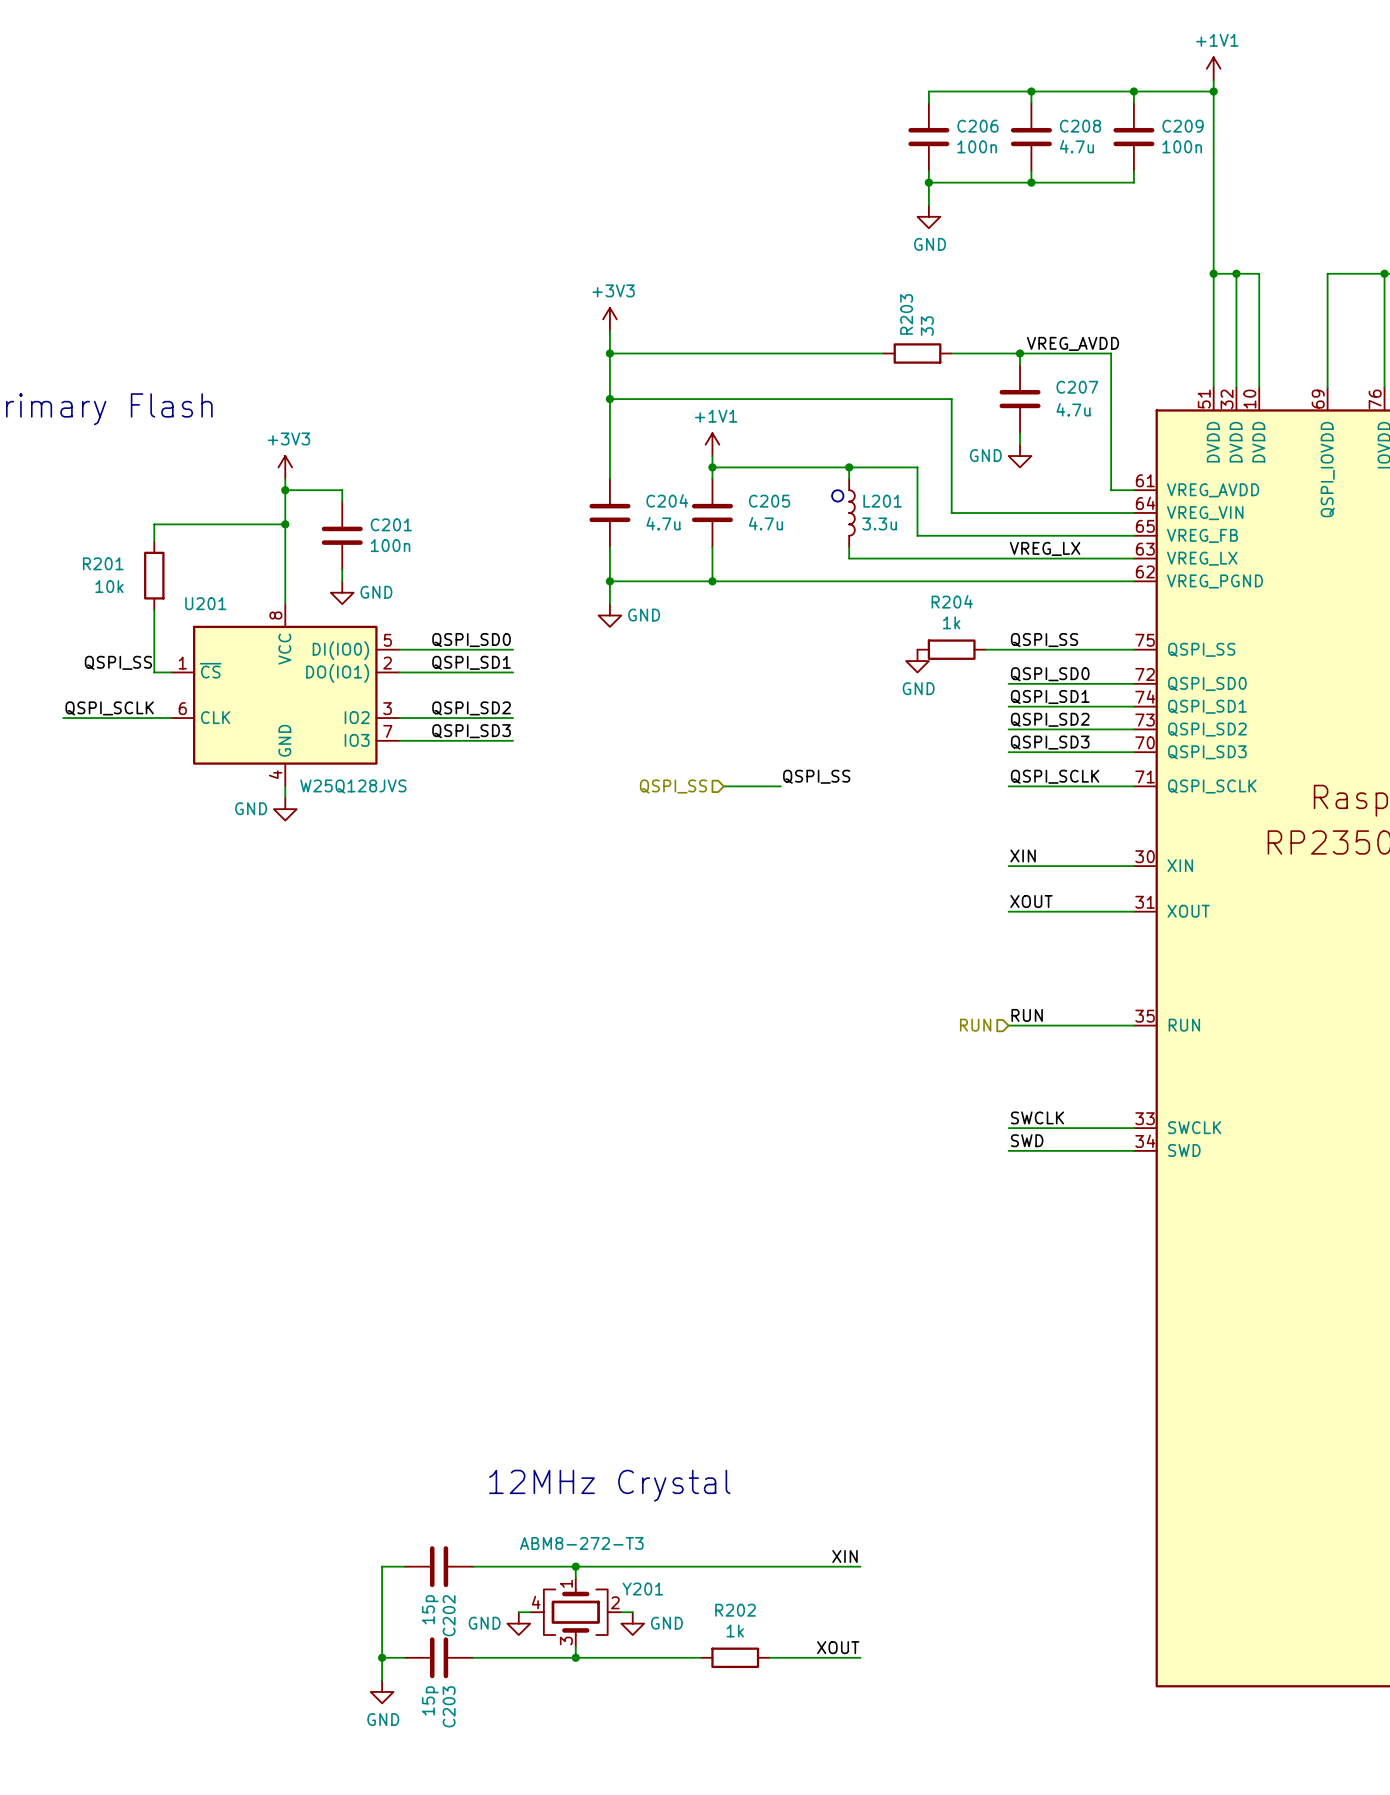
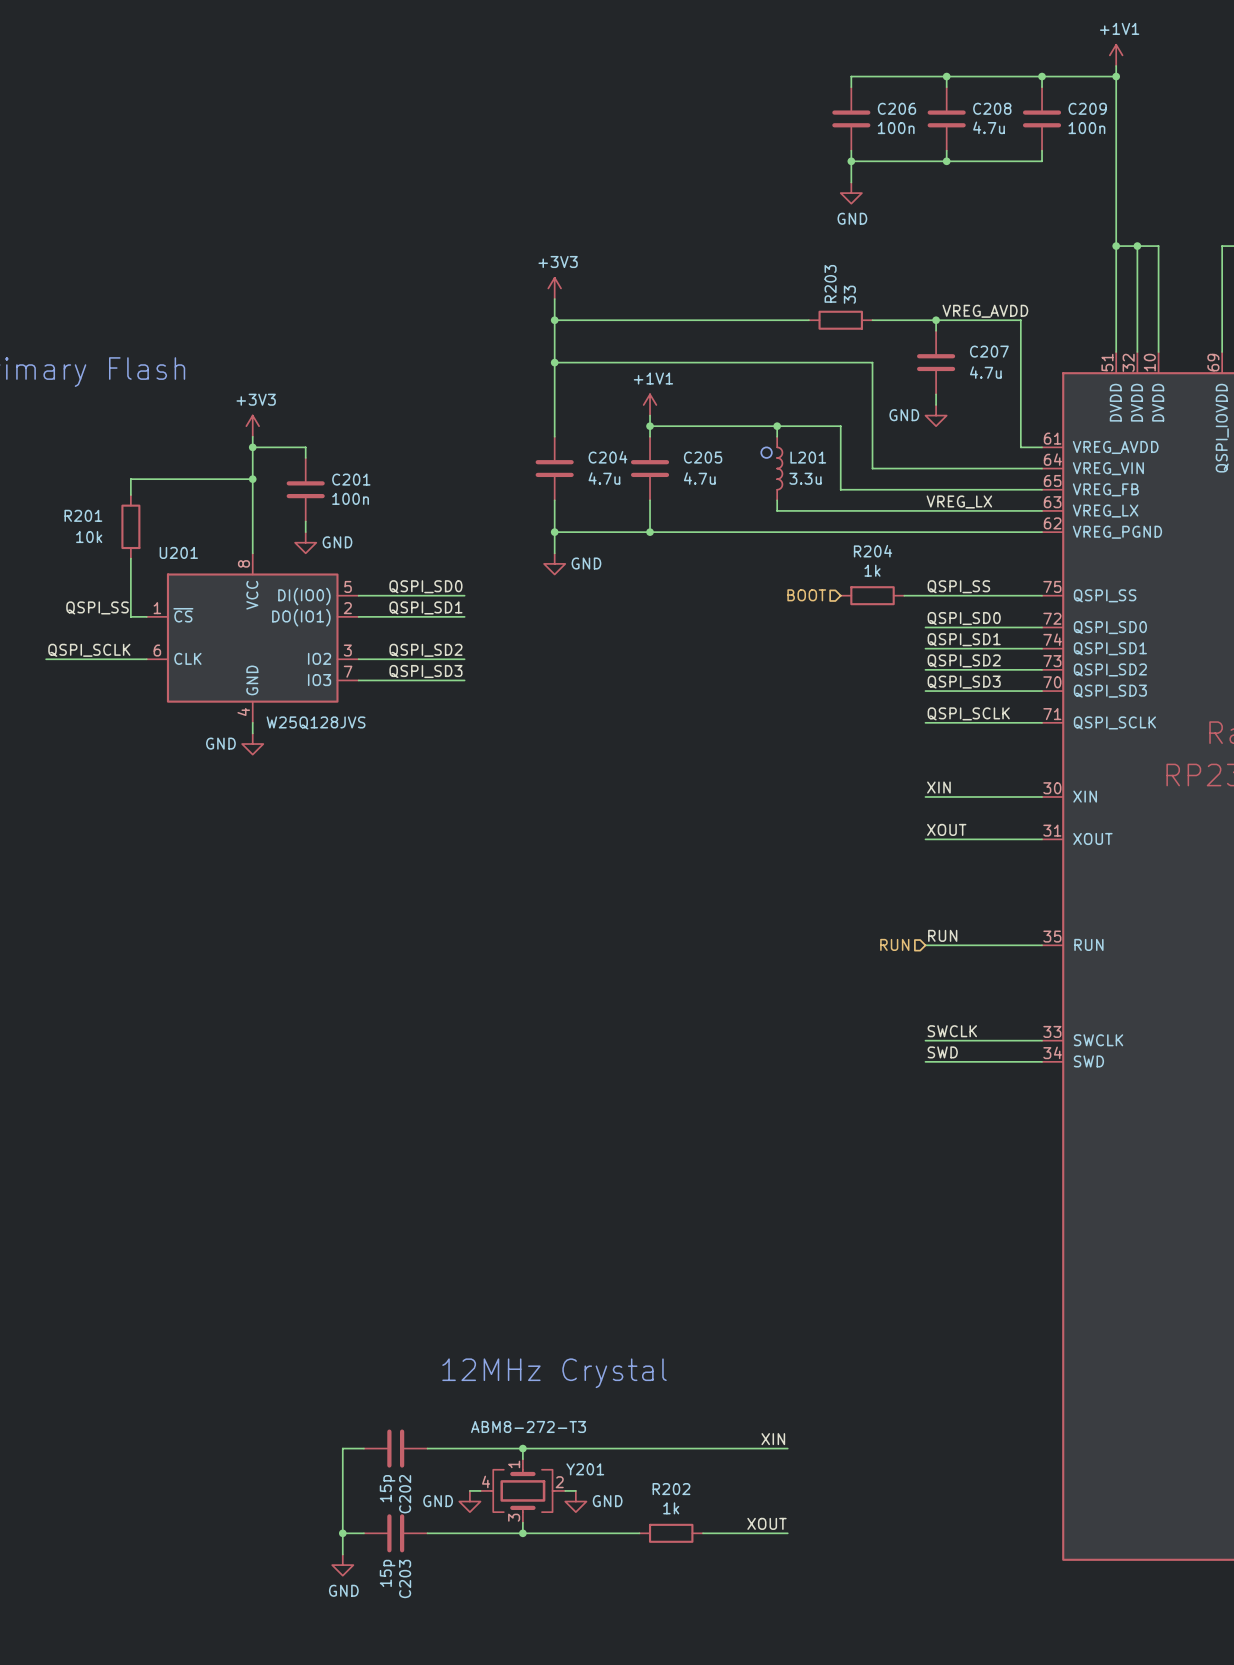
hierarchical label: none -> BOOT (806, 595)
power symbol: GND (917, 661) -> none
label: QSPI_SS (816, 776) -> none
hierarchical label: QSPI_SS (673, 786) -> none
wire: (723, 786) (780, 786) -> none

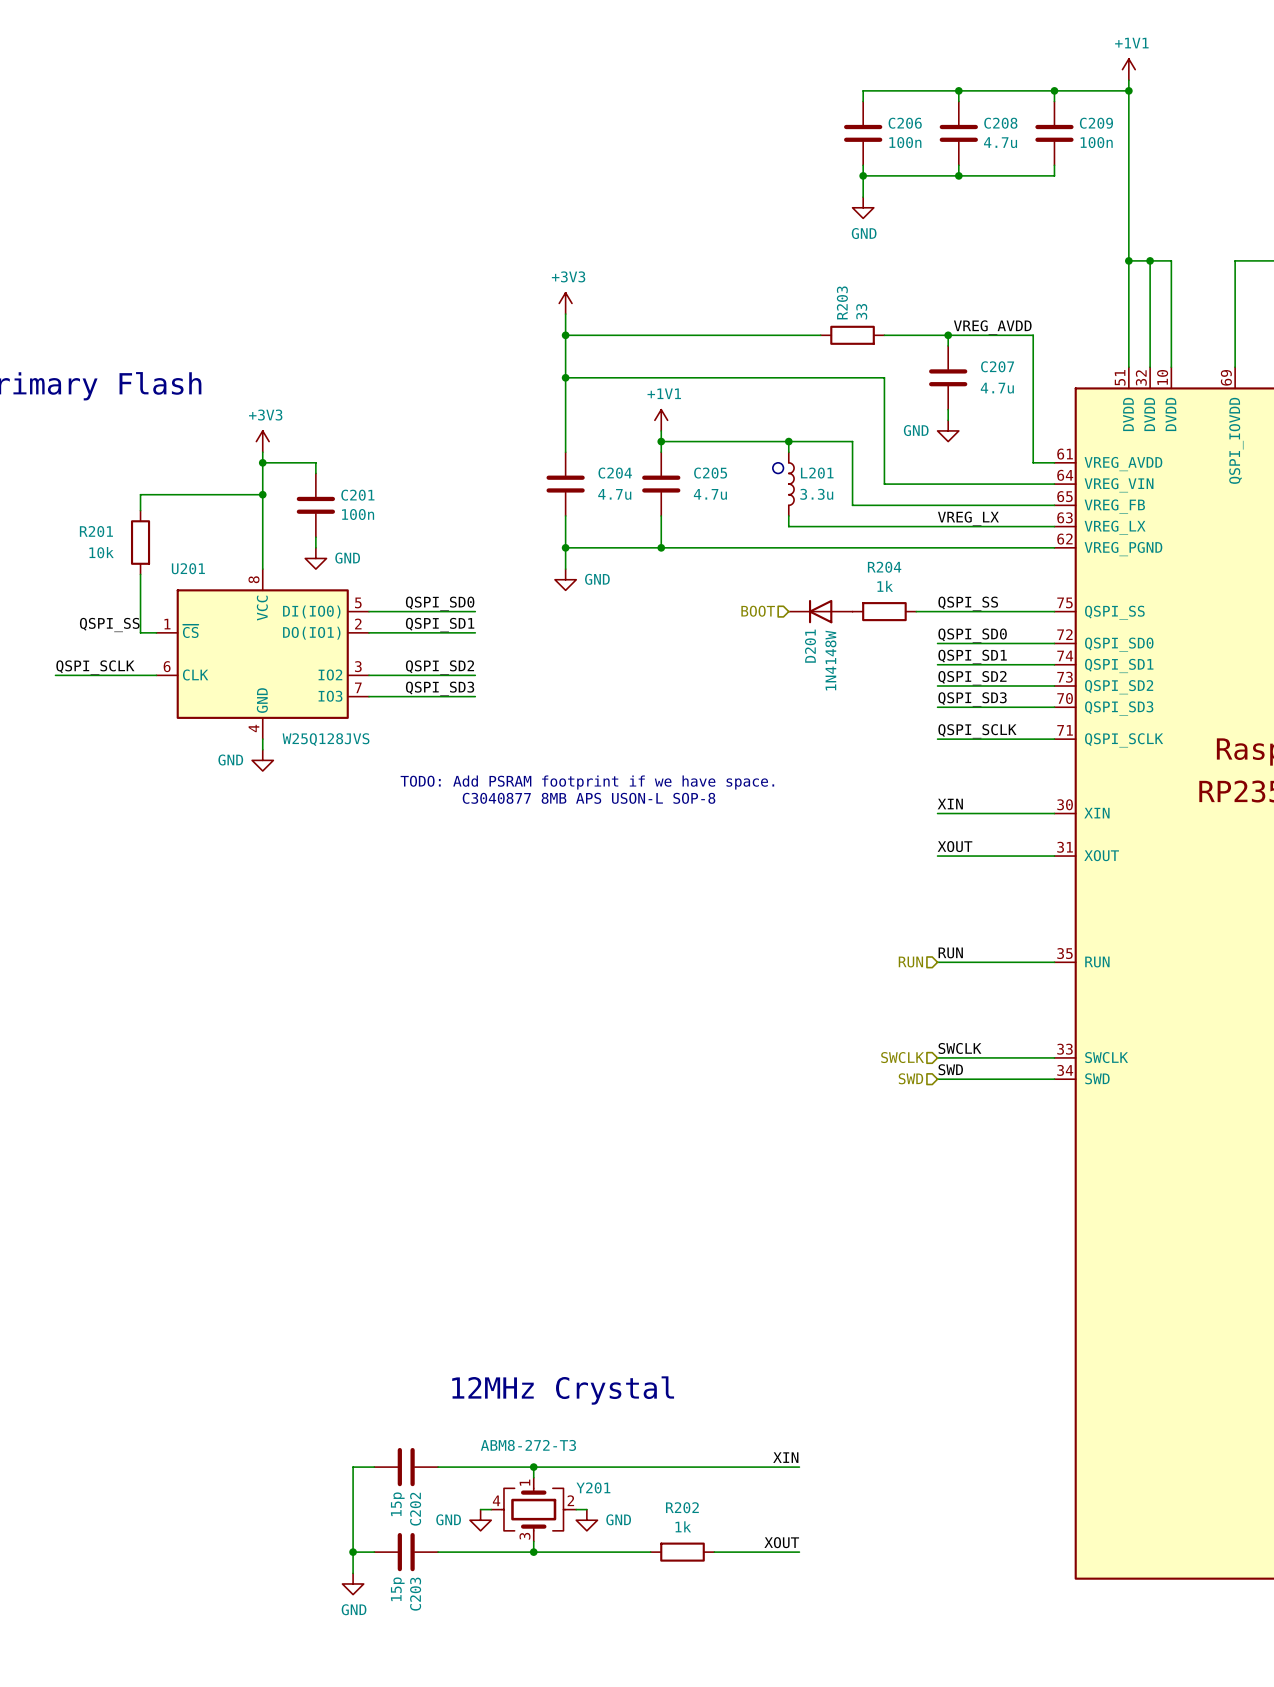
hierarchical label position: BOOT (806, 595) -> BOOT (758, 611)
D201: none -> 1N4148W (820, 611)
text: none -> TODO: Add PSRAM footprint if we have space. (587, 782)
text: none -> C3040877 8MB APS USON-L SOP-8 (589, 798)
hierarchical label: none -> SWCLK (902, 1057)
hierarchical label: none -> SWD (910, 1078)

